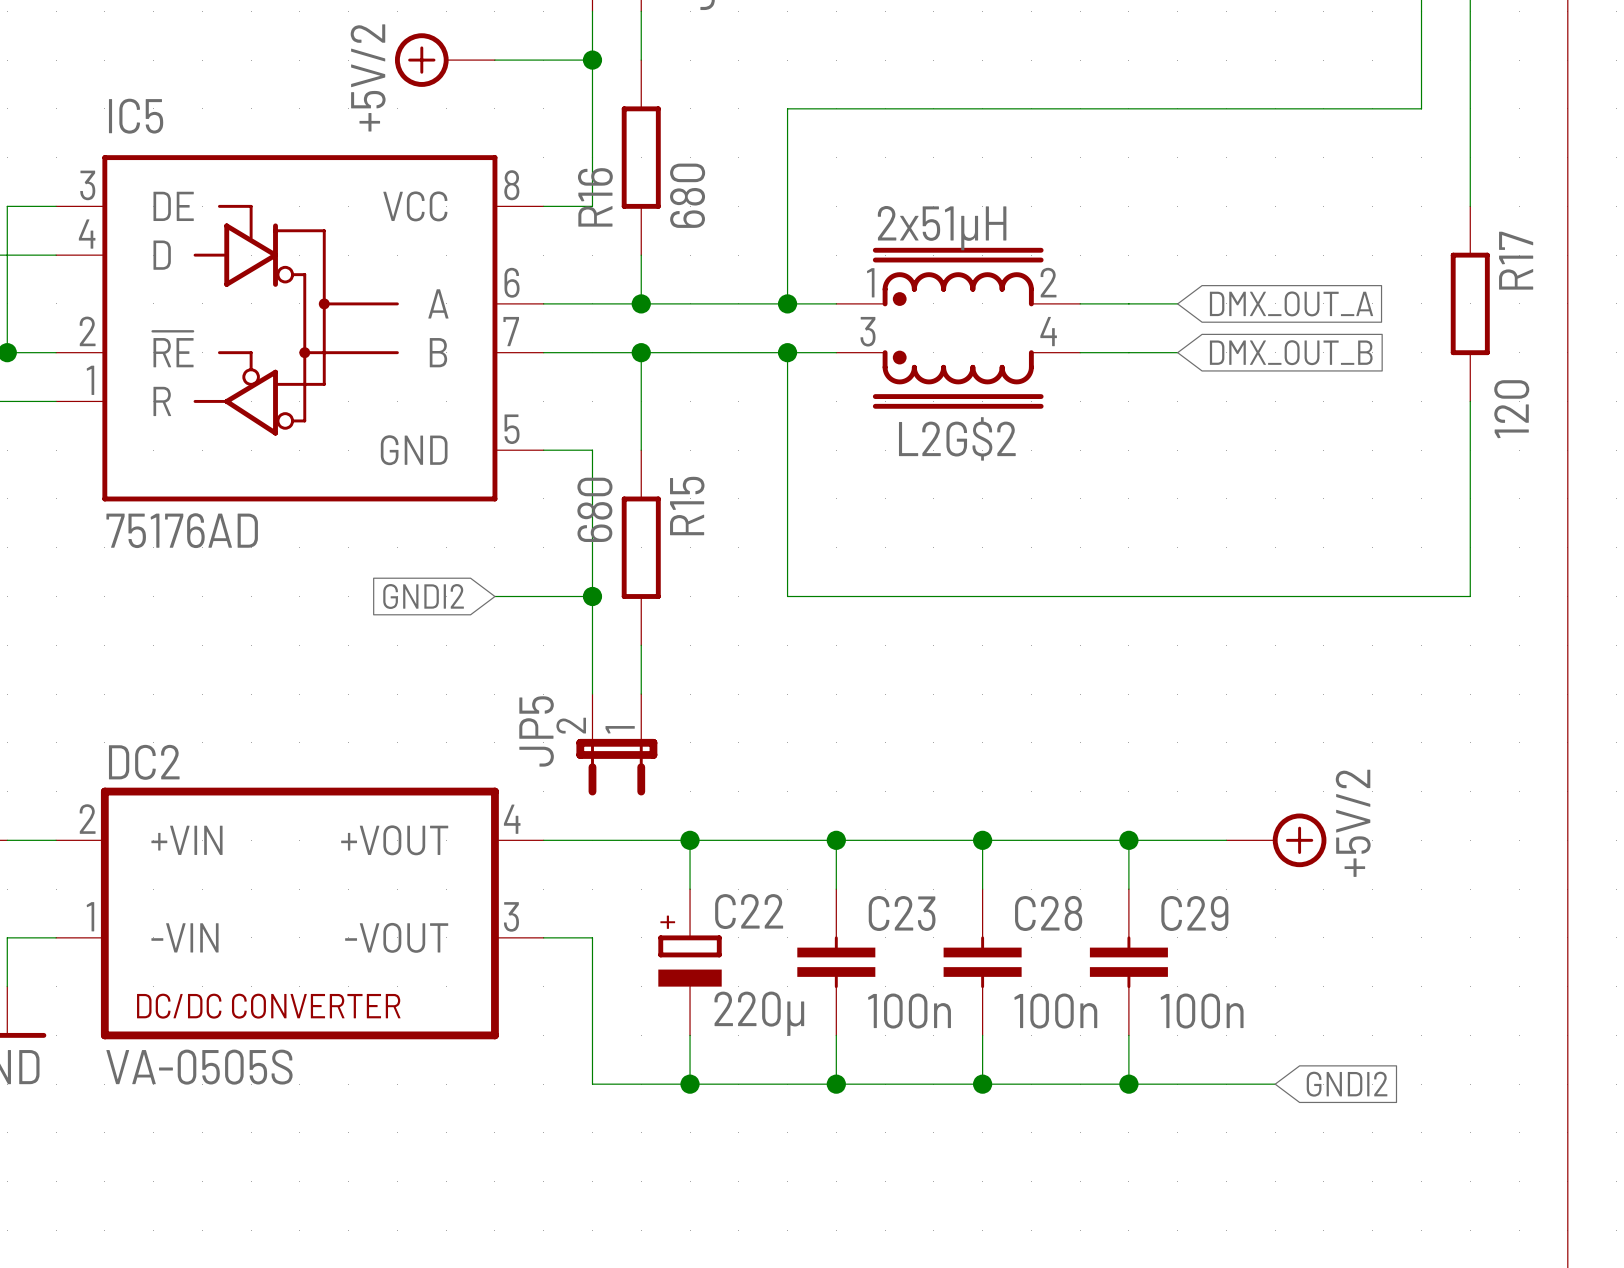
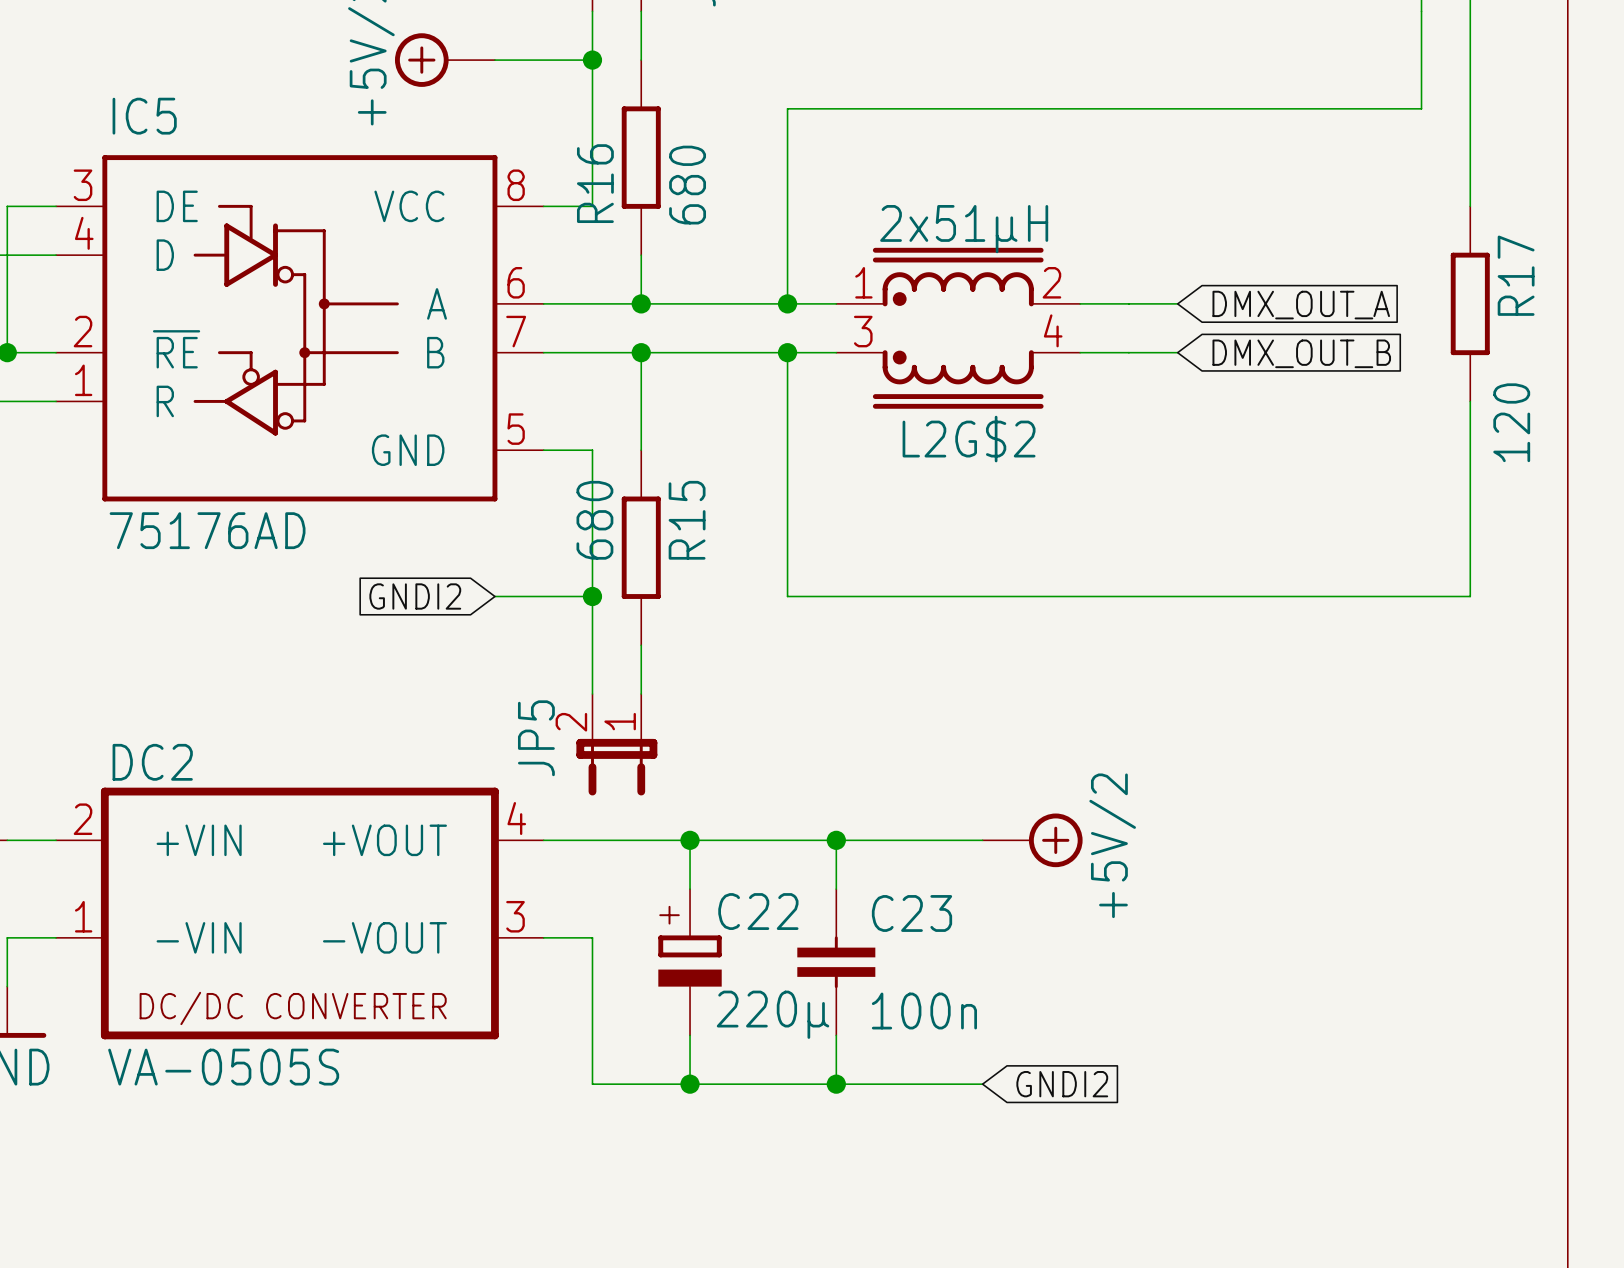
junction: (982, 840) -> none
wire: (1128, 840) (1128, 889) -> none
junction: (1128, 840) -> none
wire: (1226, 840) (982, 840) (982, 889) -> none
power symbol position: +5V/2 (1276, 840) -> +5V/2 (1032, 840)
C28: 100n (982, 962) -> none
C29: 100n (1128, 962) -> none
wire: (982, 1035) (982, 1084) (1275, 1084) -> none
wire: (1128, 1035) (1128, 1084) -> none
junction: (982, 1084) -> none
junction: (1128, 1084) -> none
global label position: GNDI2 (1347, 1084) -> GNDI2 (1062, 1084)

